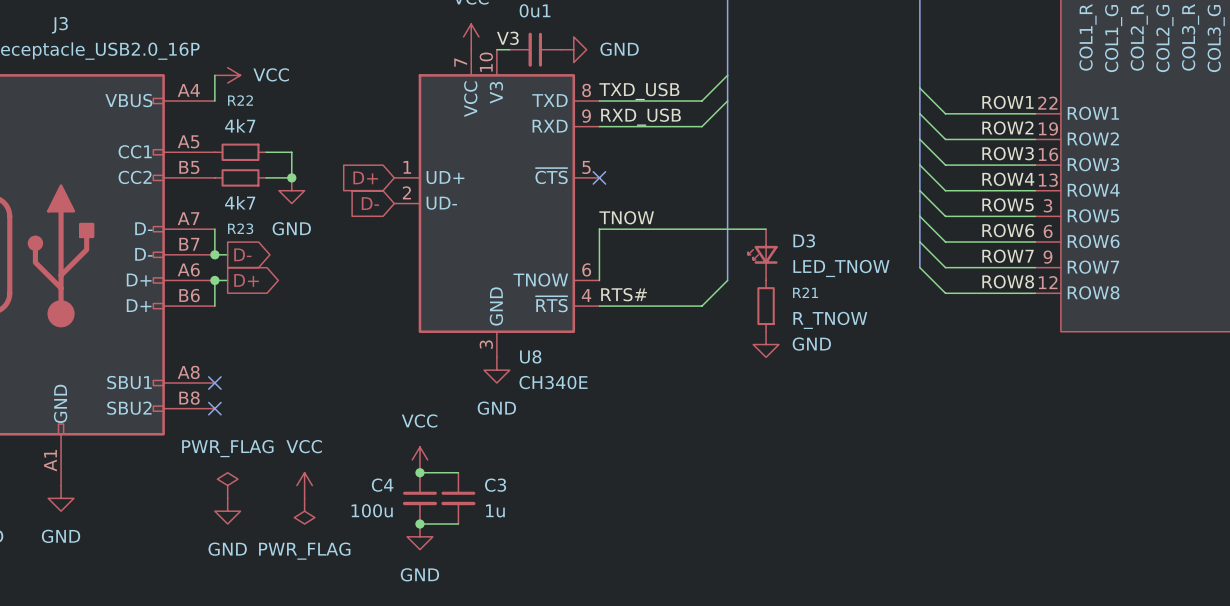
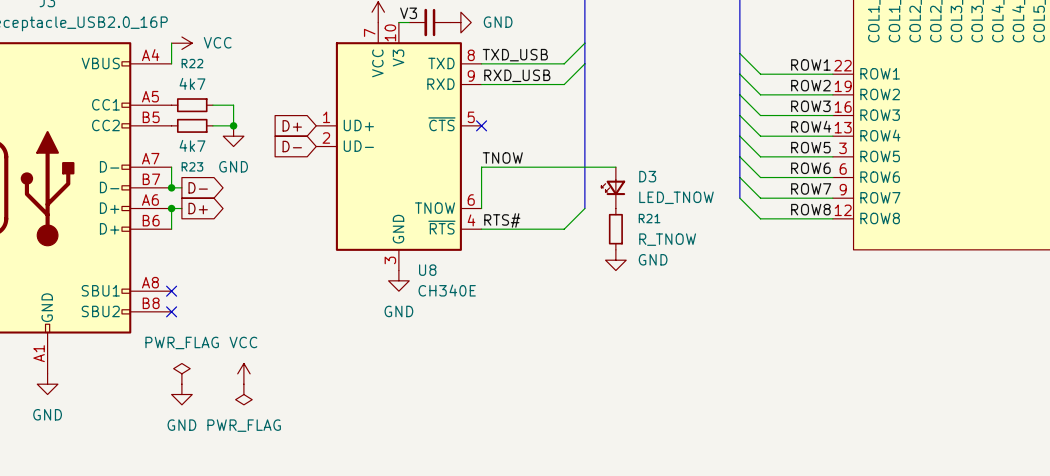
power symbol: VCC (419, 459) -> none
wire: (419, 472) (458, 472) -> none
junction: (419, 472) -> none
C4: 100u (419, 498) -> none
C3: 1u (458, 498) -> none
wire: (419, 524) (458, 524) -> none
junction: (419, 524) -> none
power symbol: GND (419, 536) -> none

